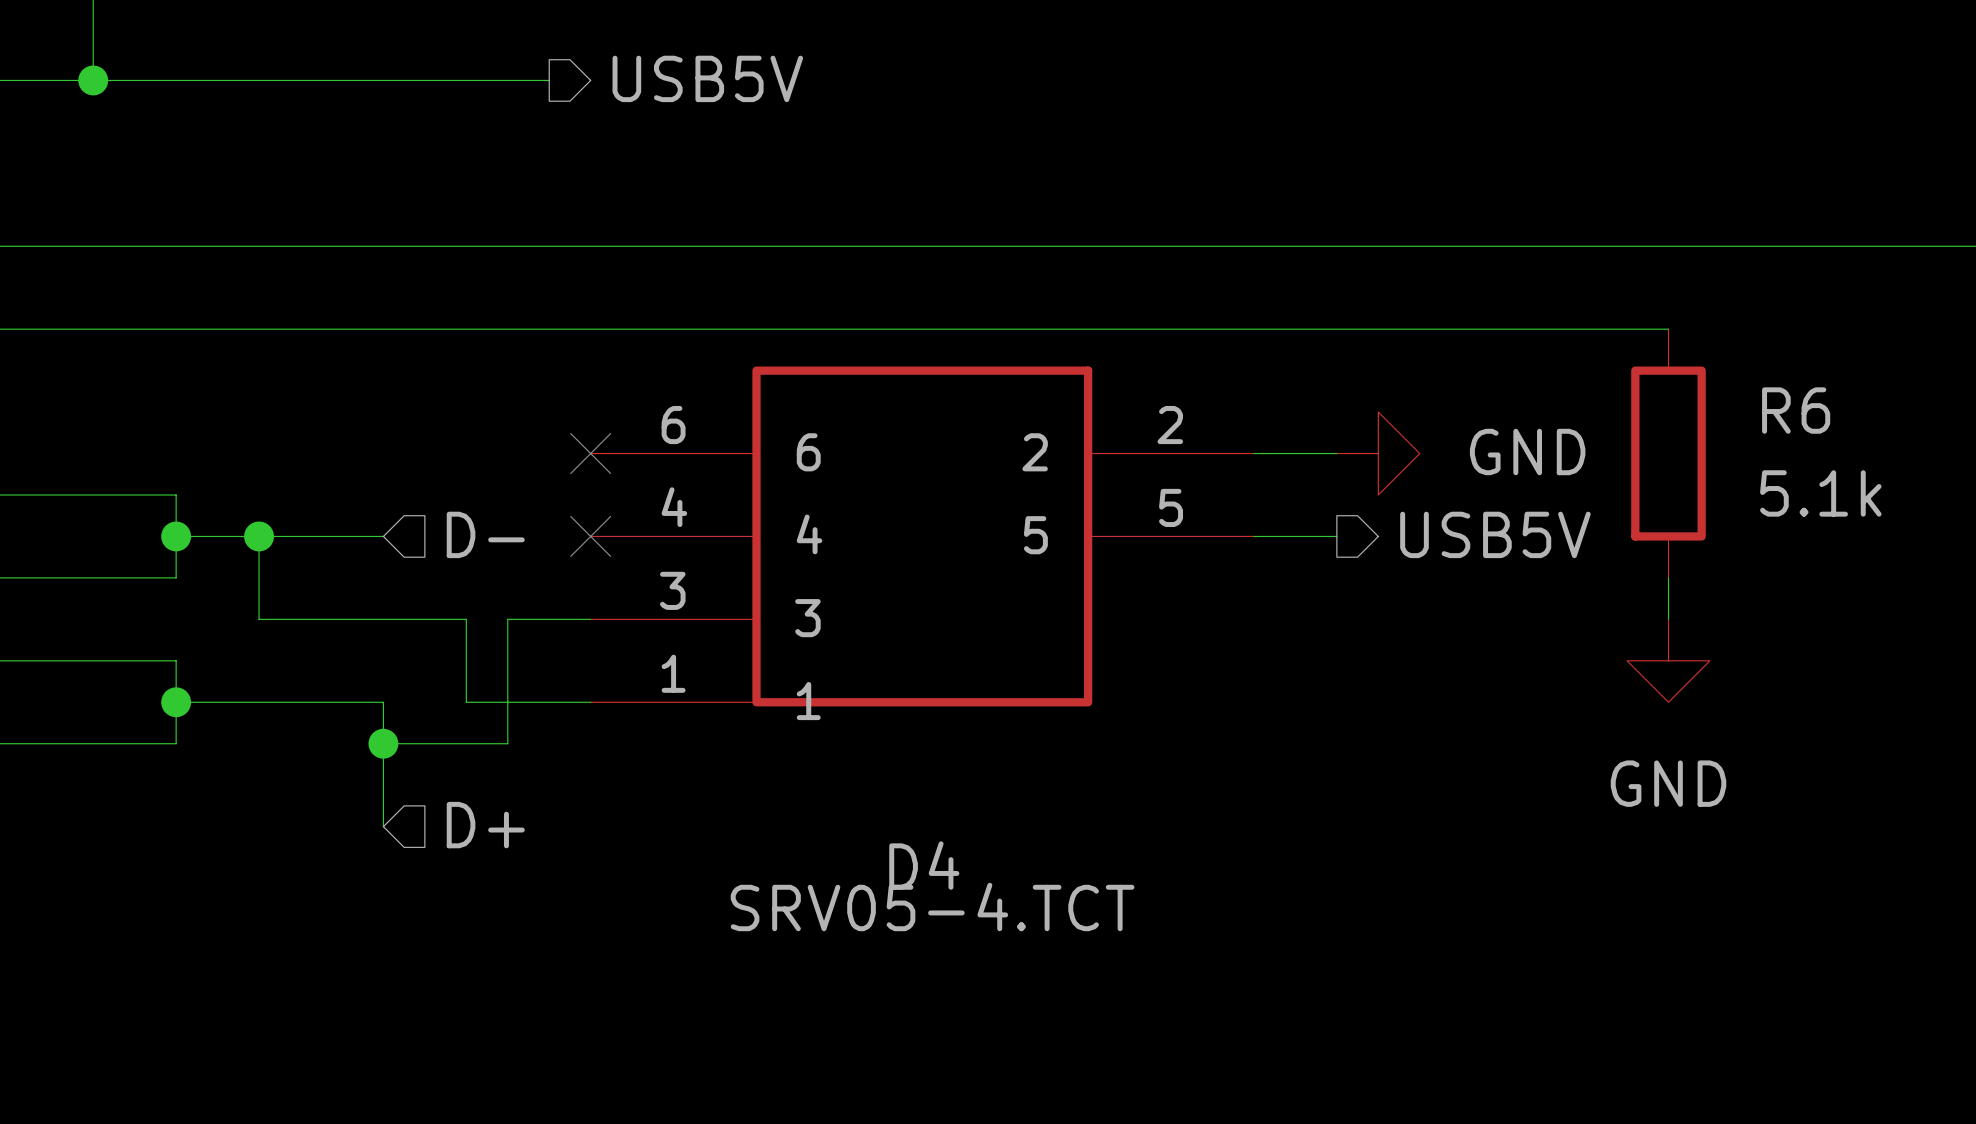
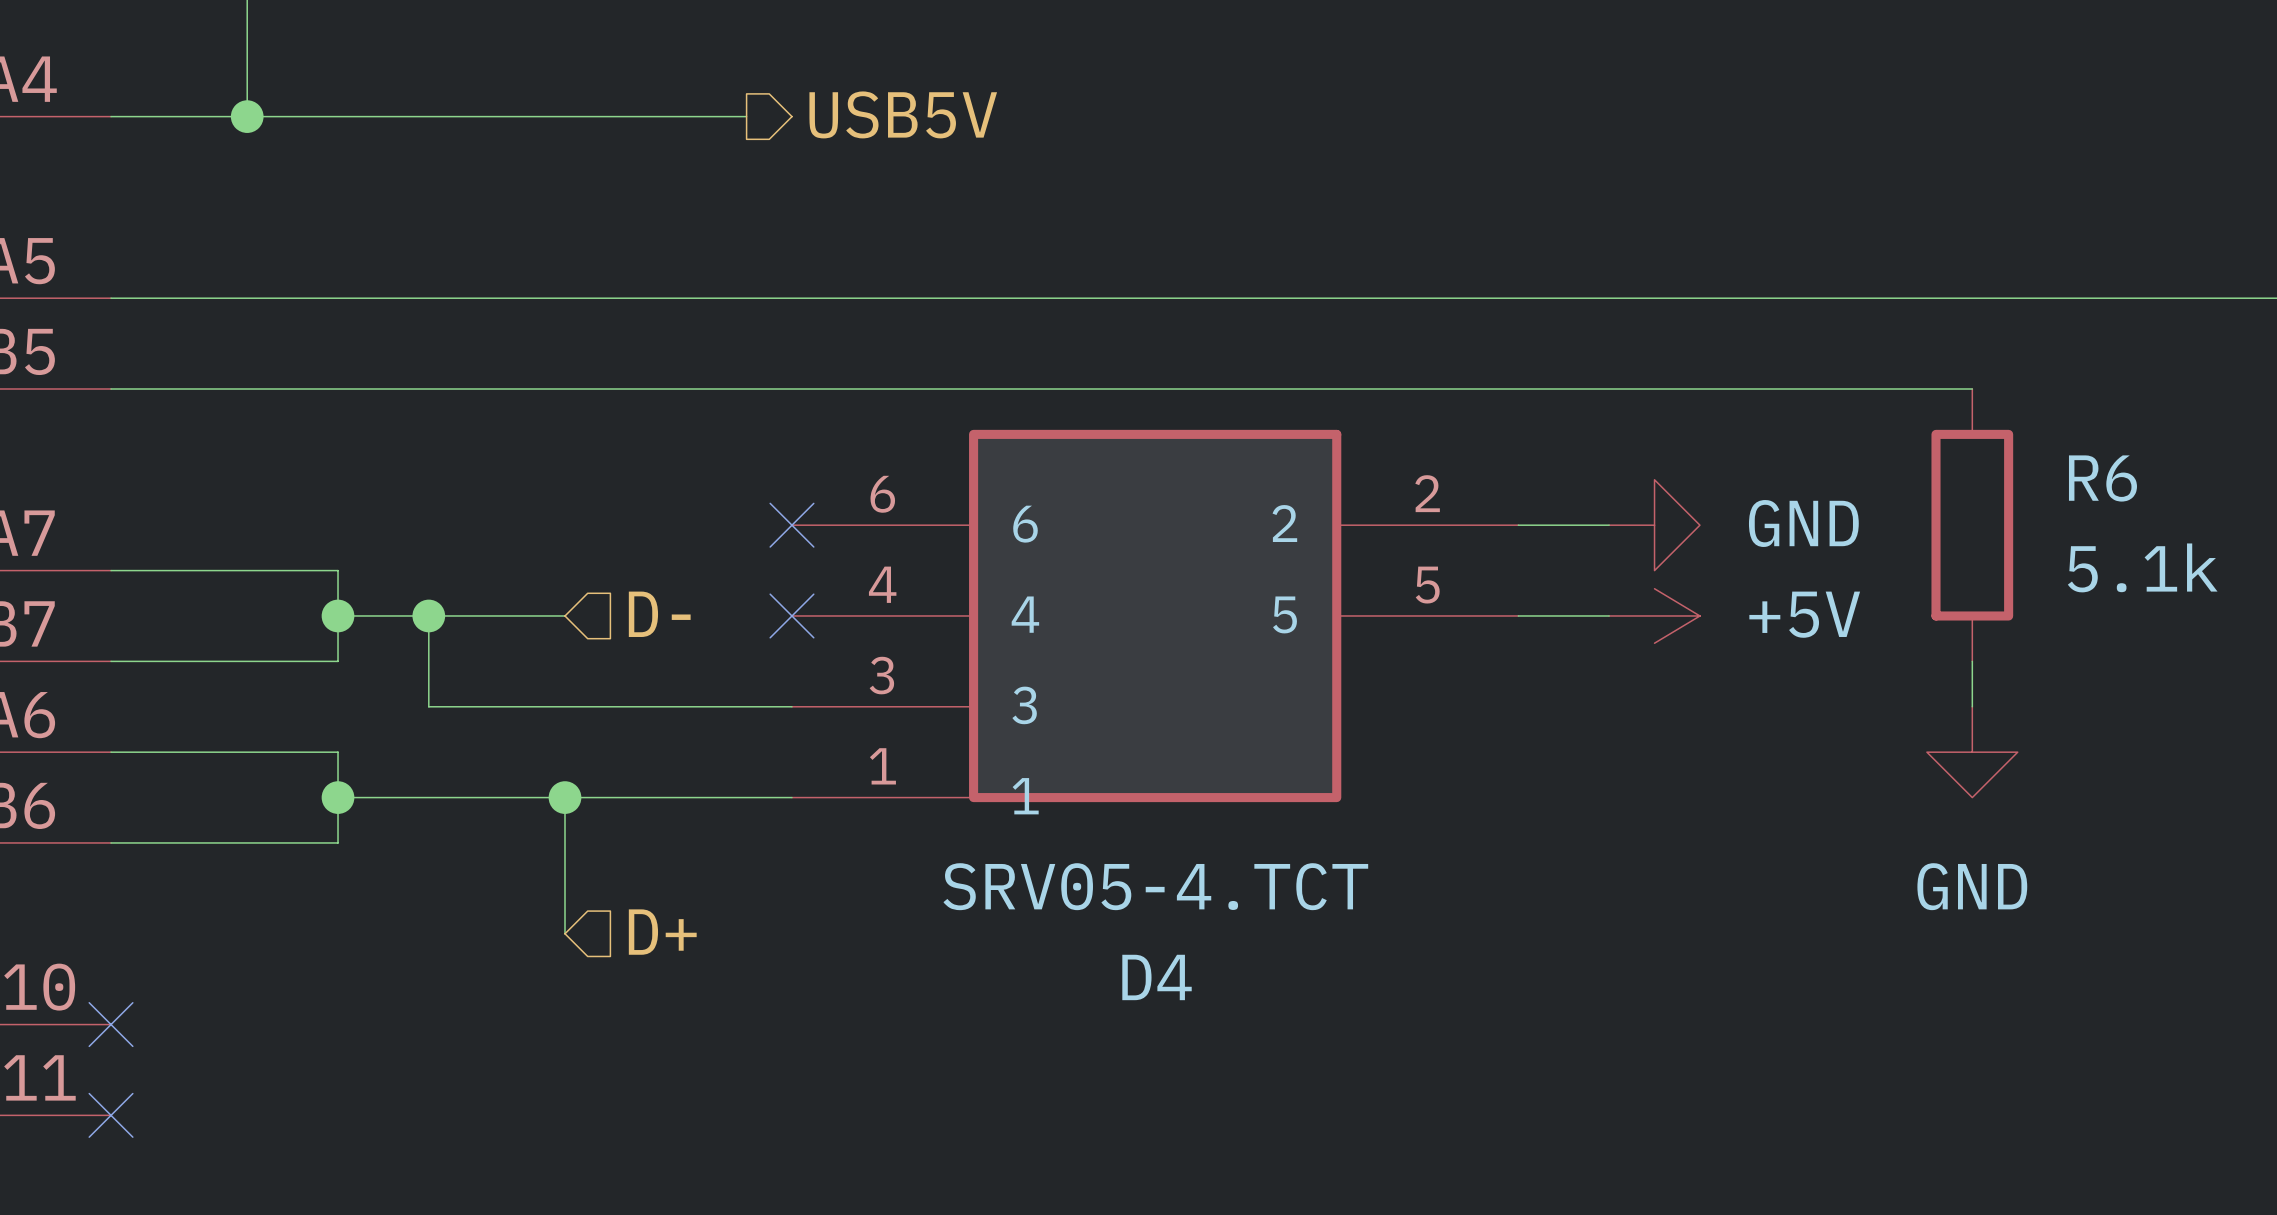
hierarchical label: USB5V (1495, 534) -> none
power symbol: none -> +5V (1654, 615)
wire: (466, 619) (466, 702) -> (655, 706) (701, 706)
wire: (507, 619) (507, 743) (383, 743) -> none
wire: none -> (564, 797) (655, 797)
junction position: (383, 743) -> (564, 797)
D4 value position: SRV05-4.TCT (932, 907) -> SRV05-4.TCT (1155, 886)

